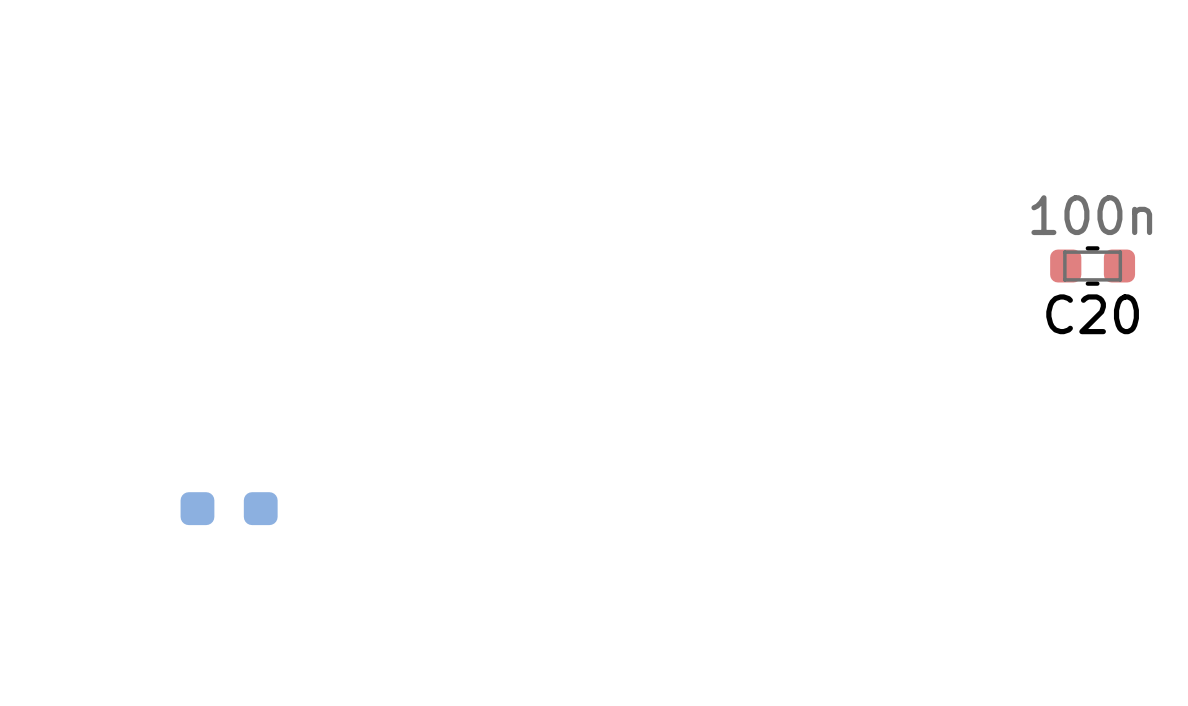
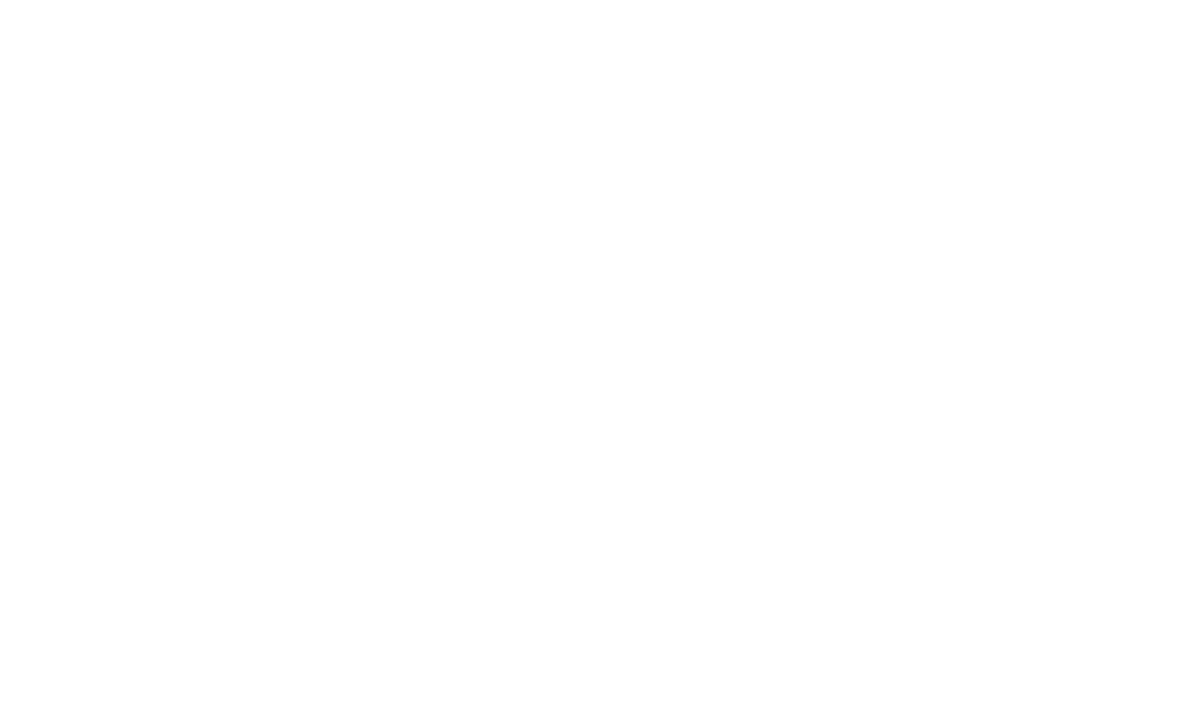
C20: 100n (1092, 266) -> none
part: (229, 508) -> none

